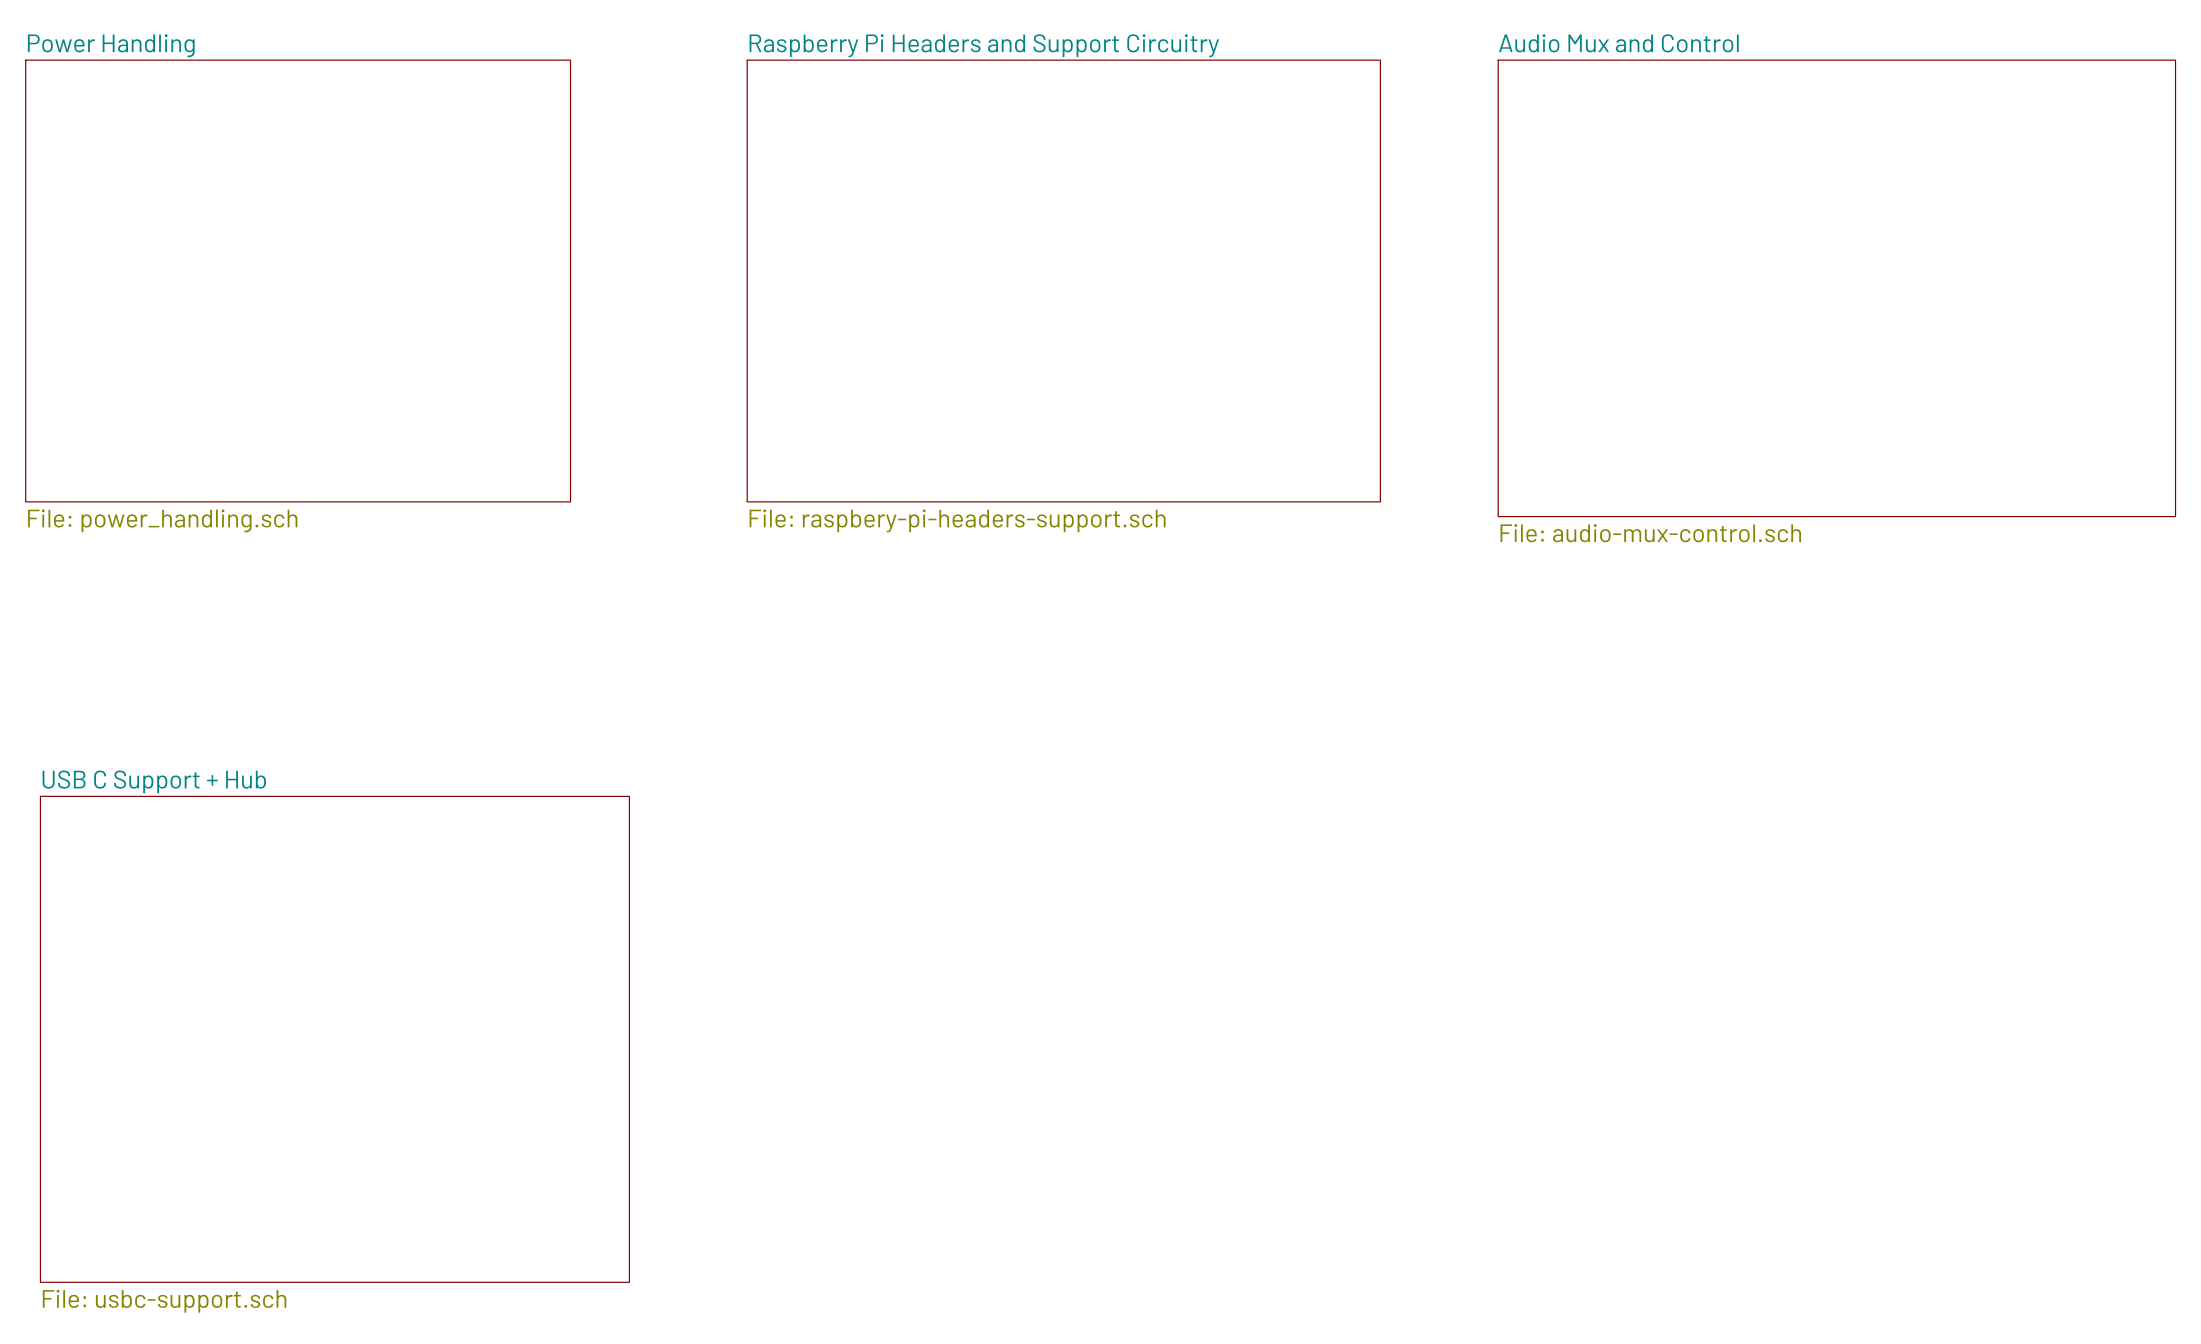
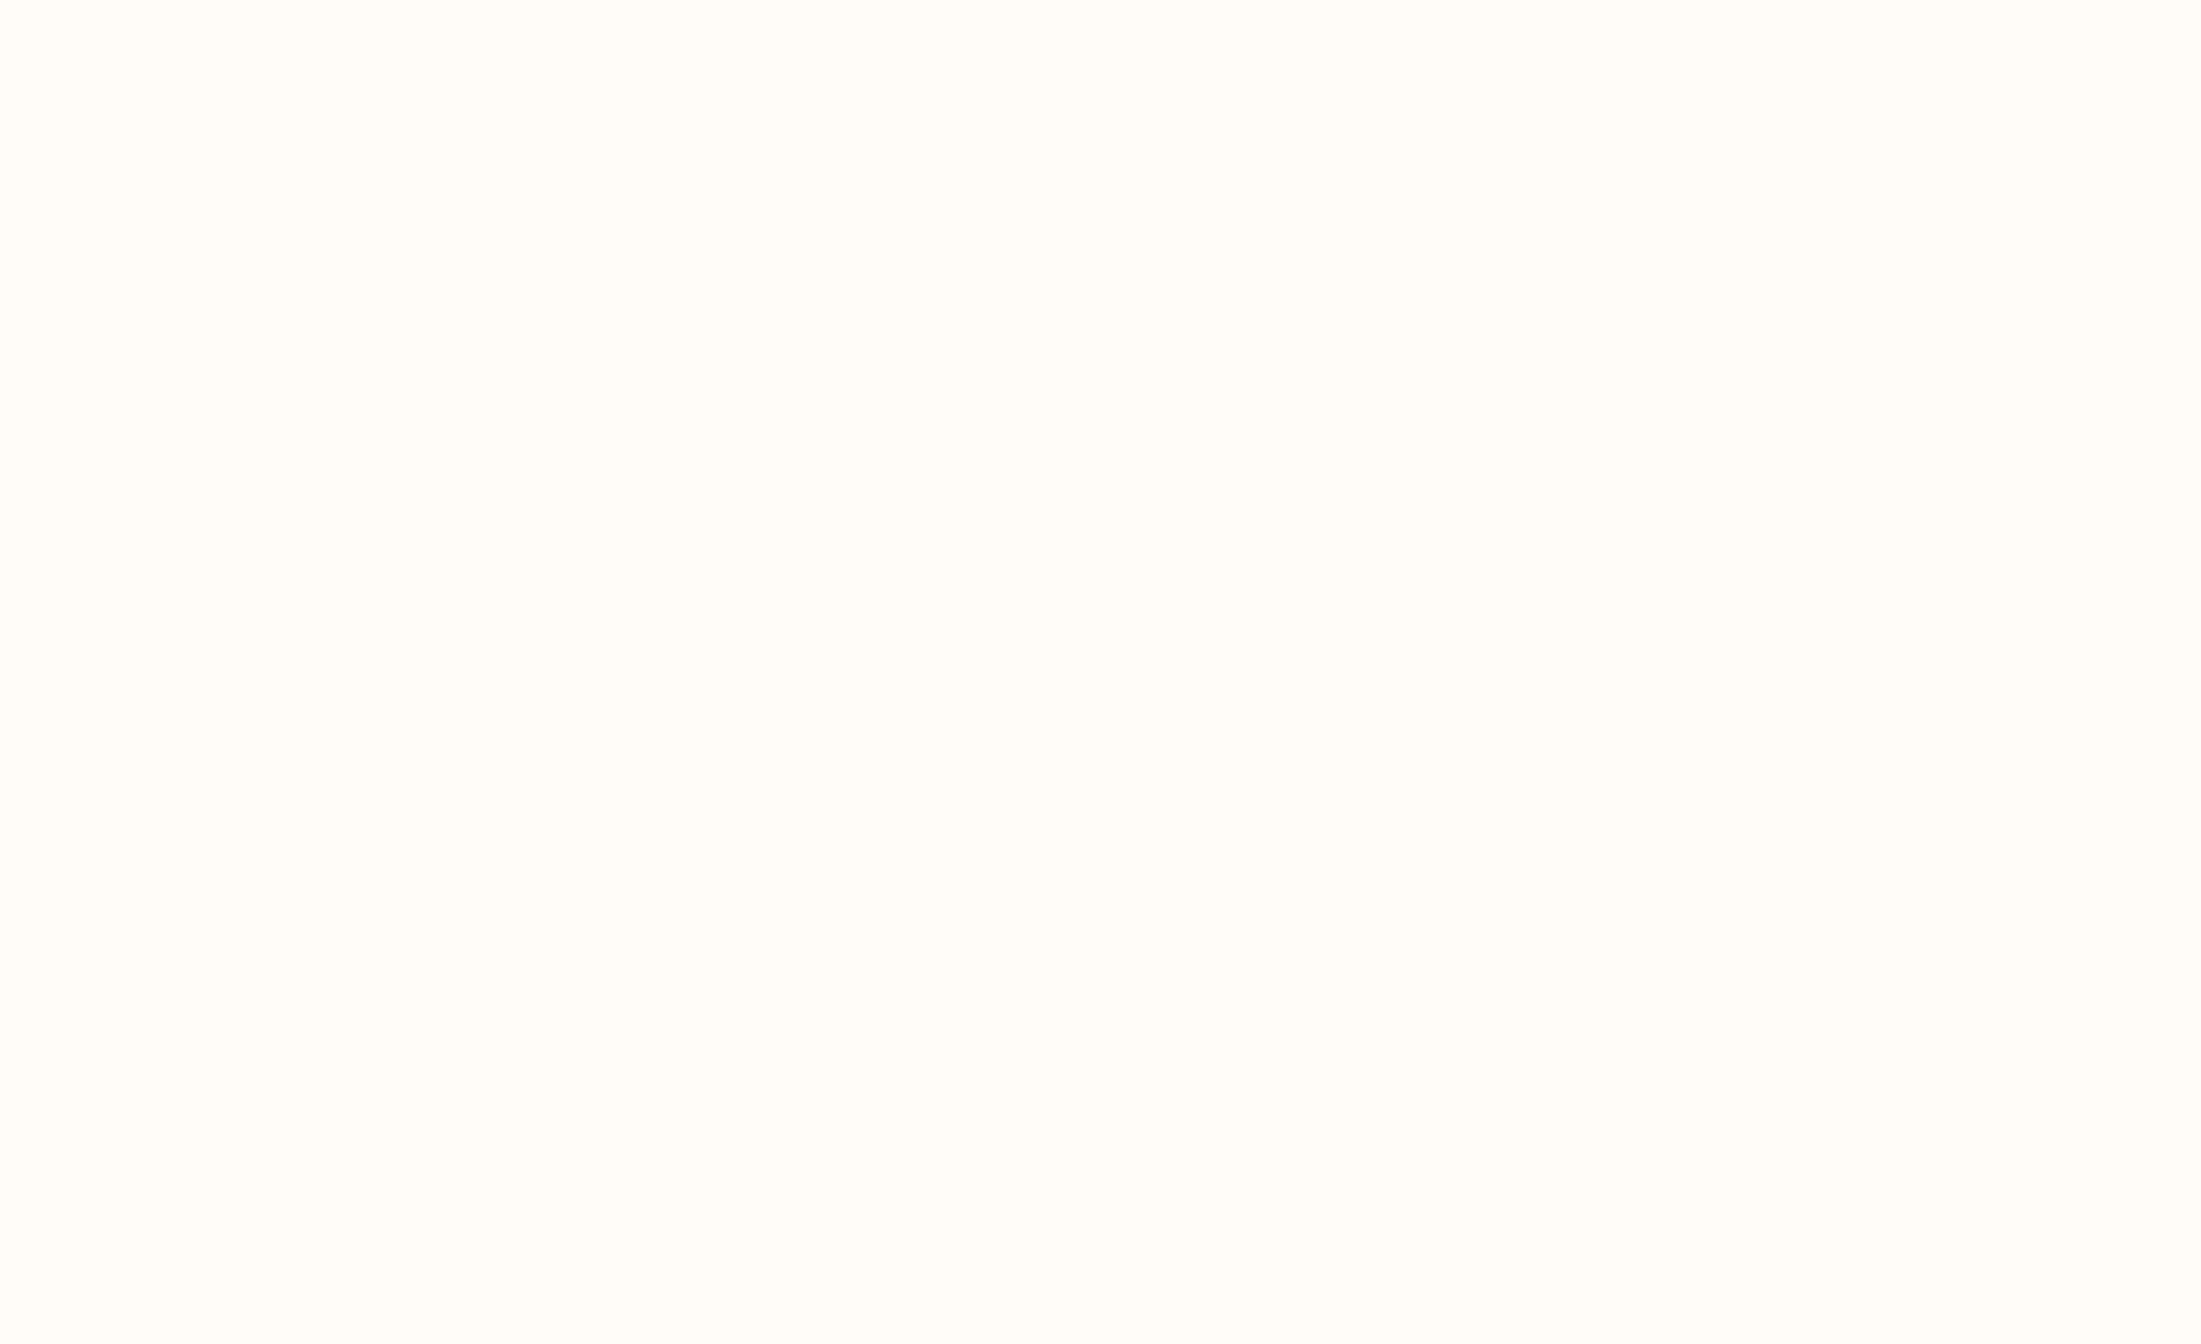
sheet Power Handling: File: power_handling.sch (298, 281) -> none
sheet Raspberry Pi Headers and Support Circuitry: File: raspbery-pi-headers-support.sch (1063, 281) -> none
sheet Audio Mux and Control: File: audio-mux-control.sch (1836, 288) -> none
sheet USB C Support + Hub: File: usbc-support.sch (334, 1039) -> none

